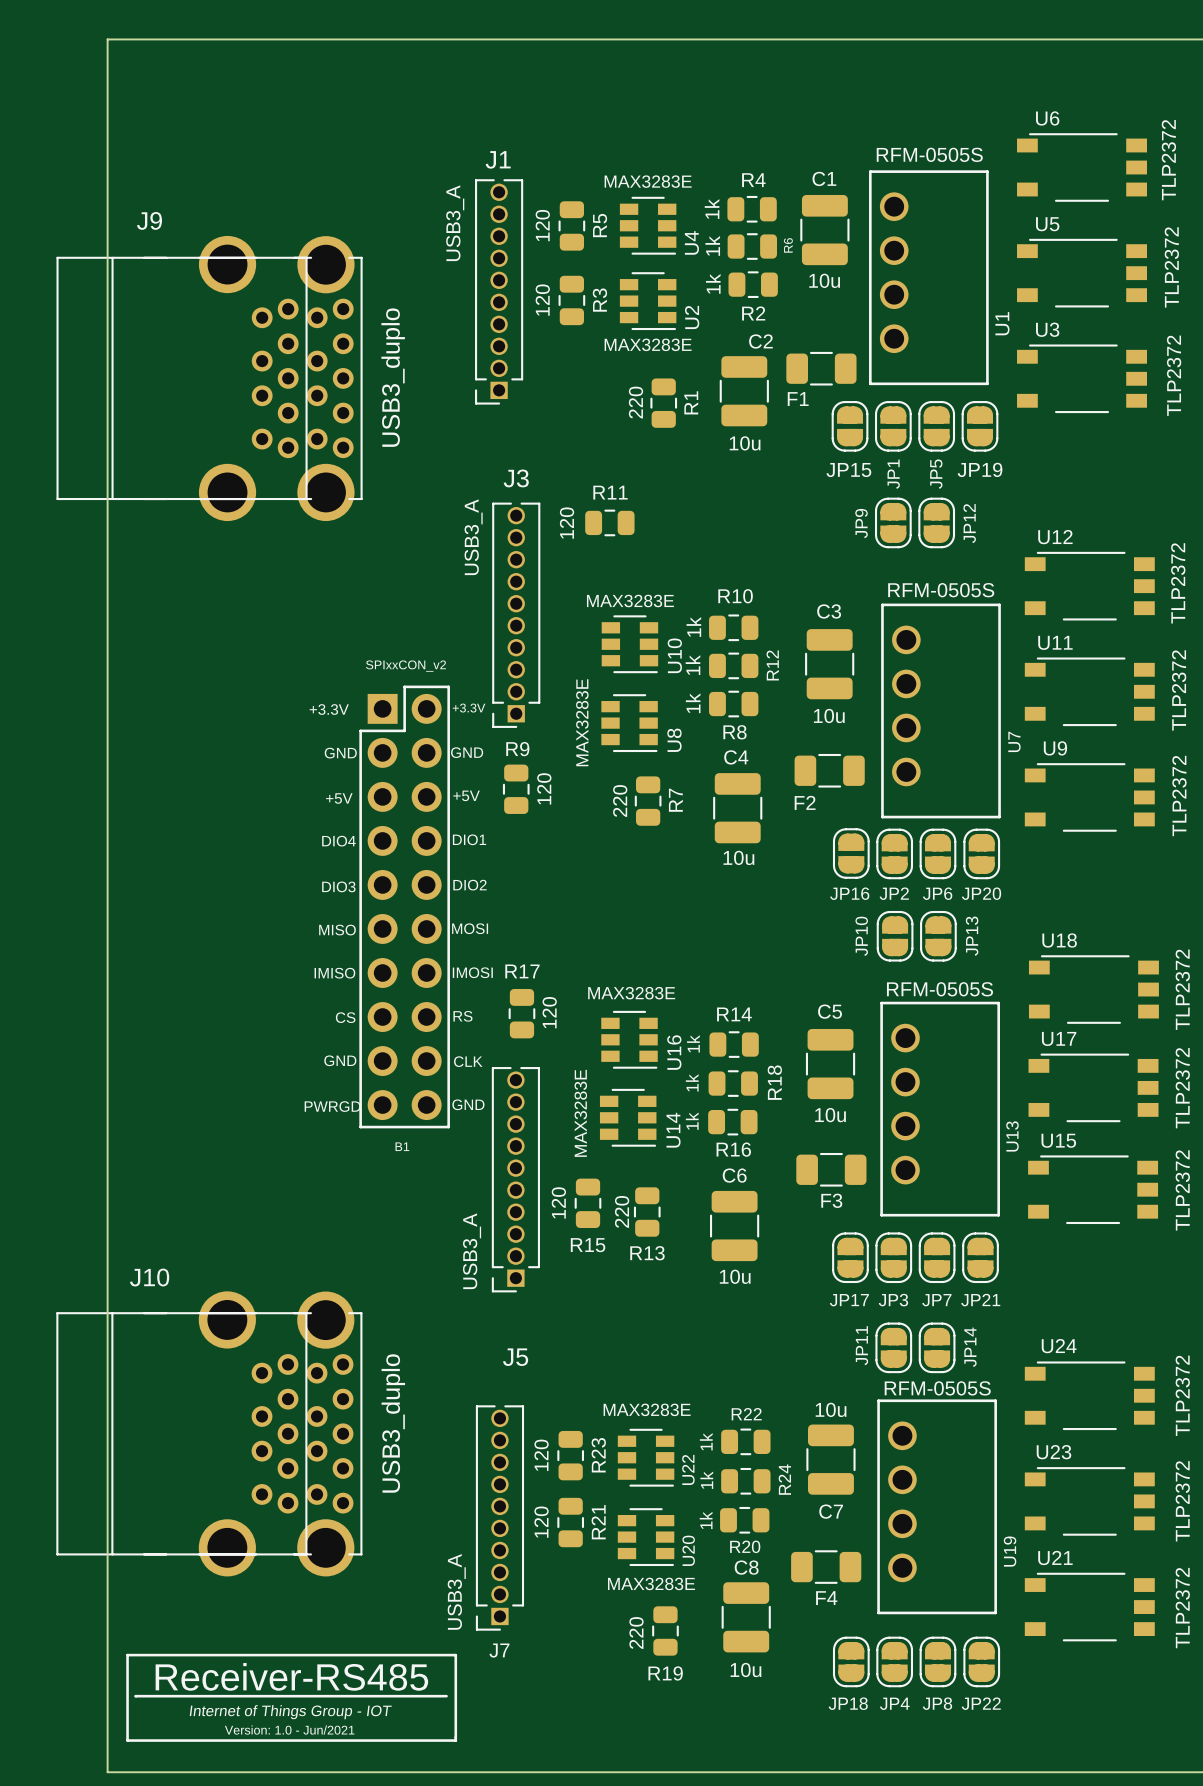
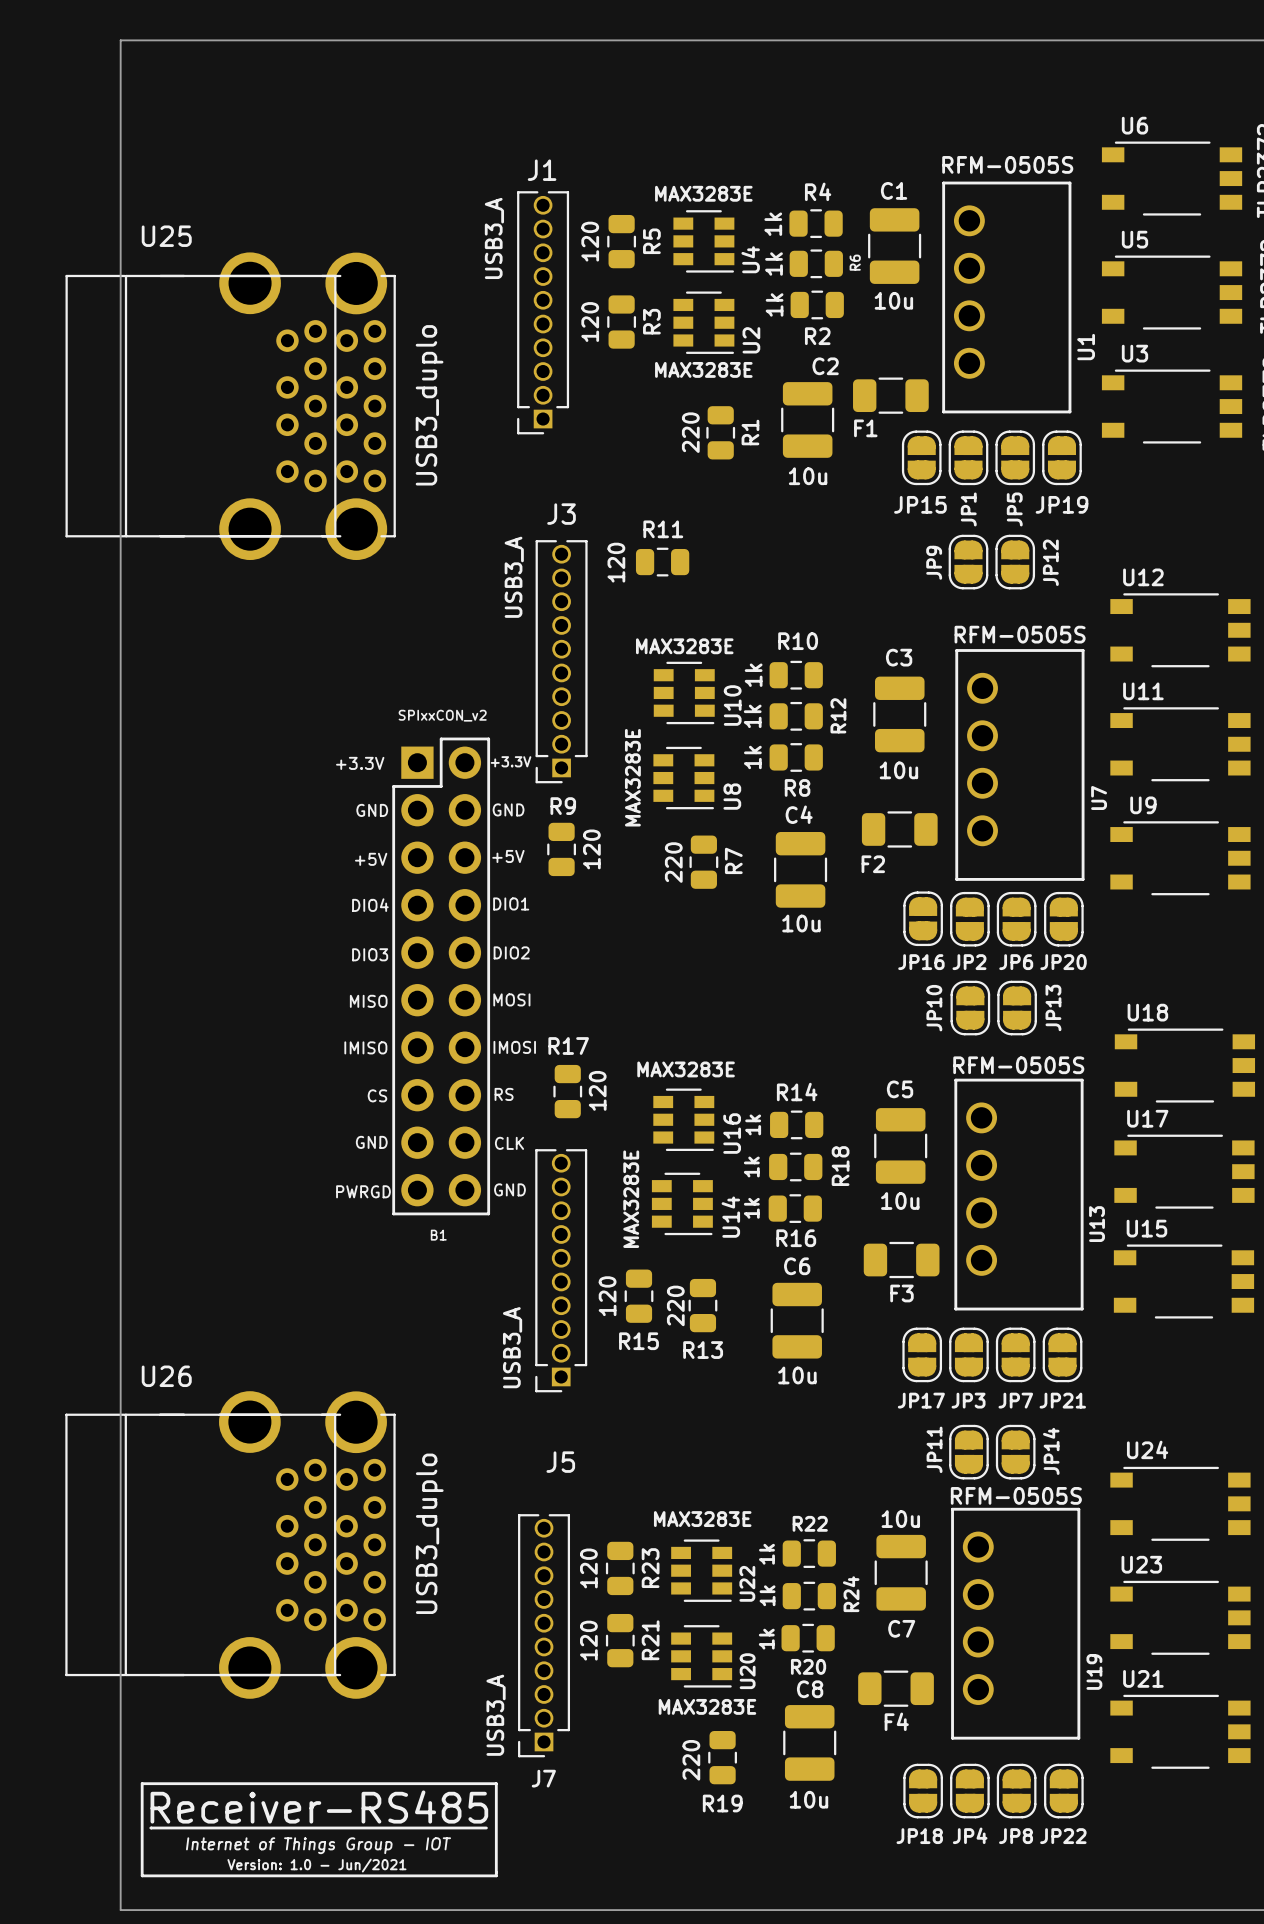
J9 name: J9 (149, 220) -> U25 (166, 236)
J10 name: J10 (149, 1277) -> U26 (166, 1376)

